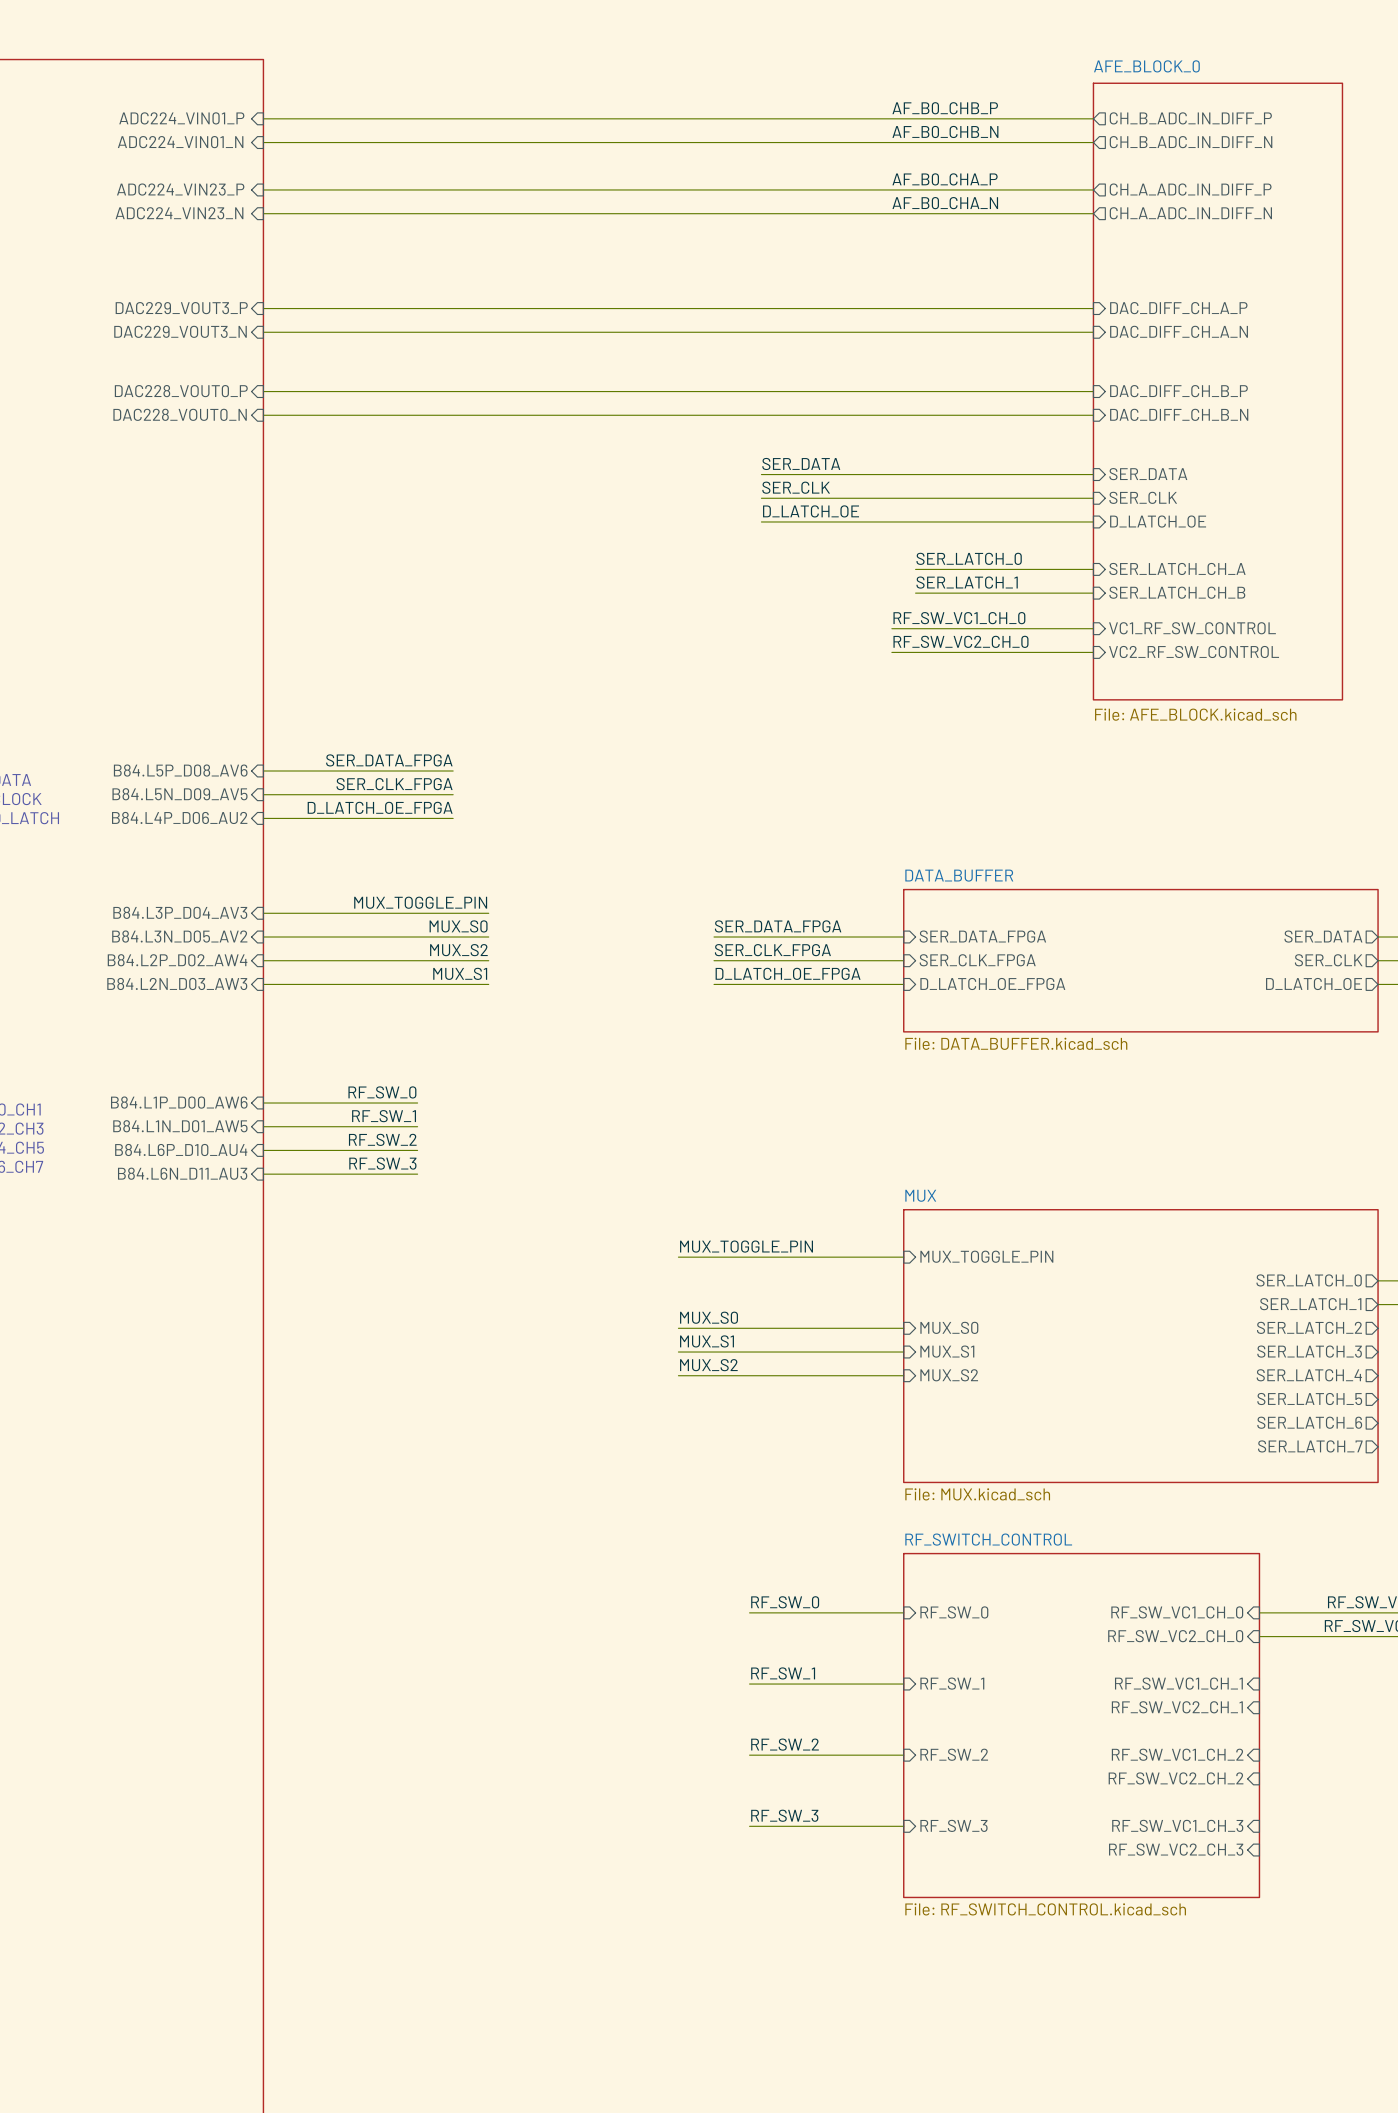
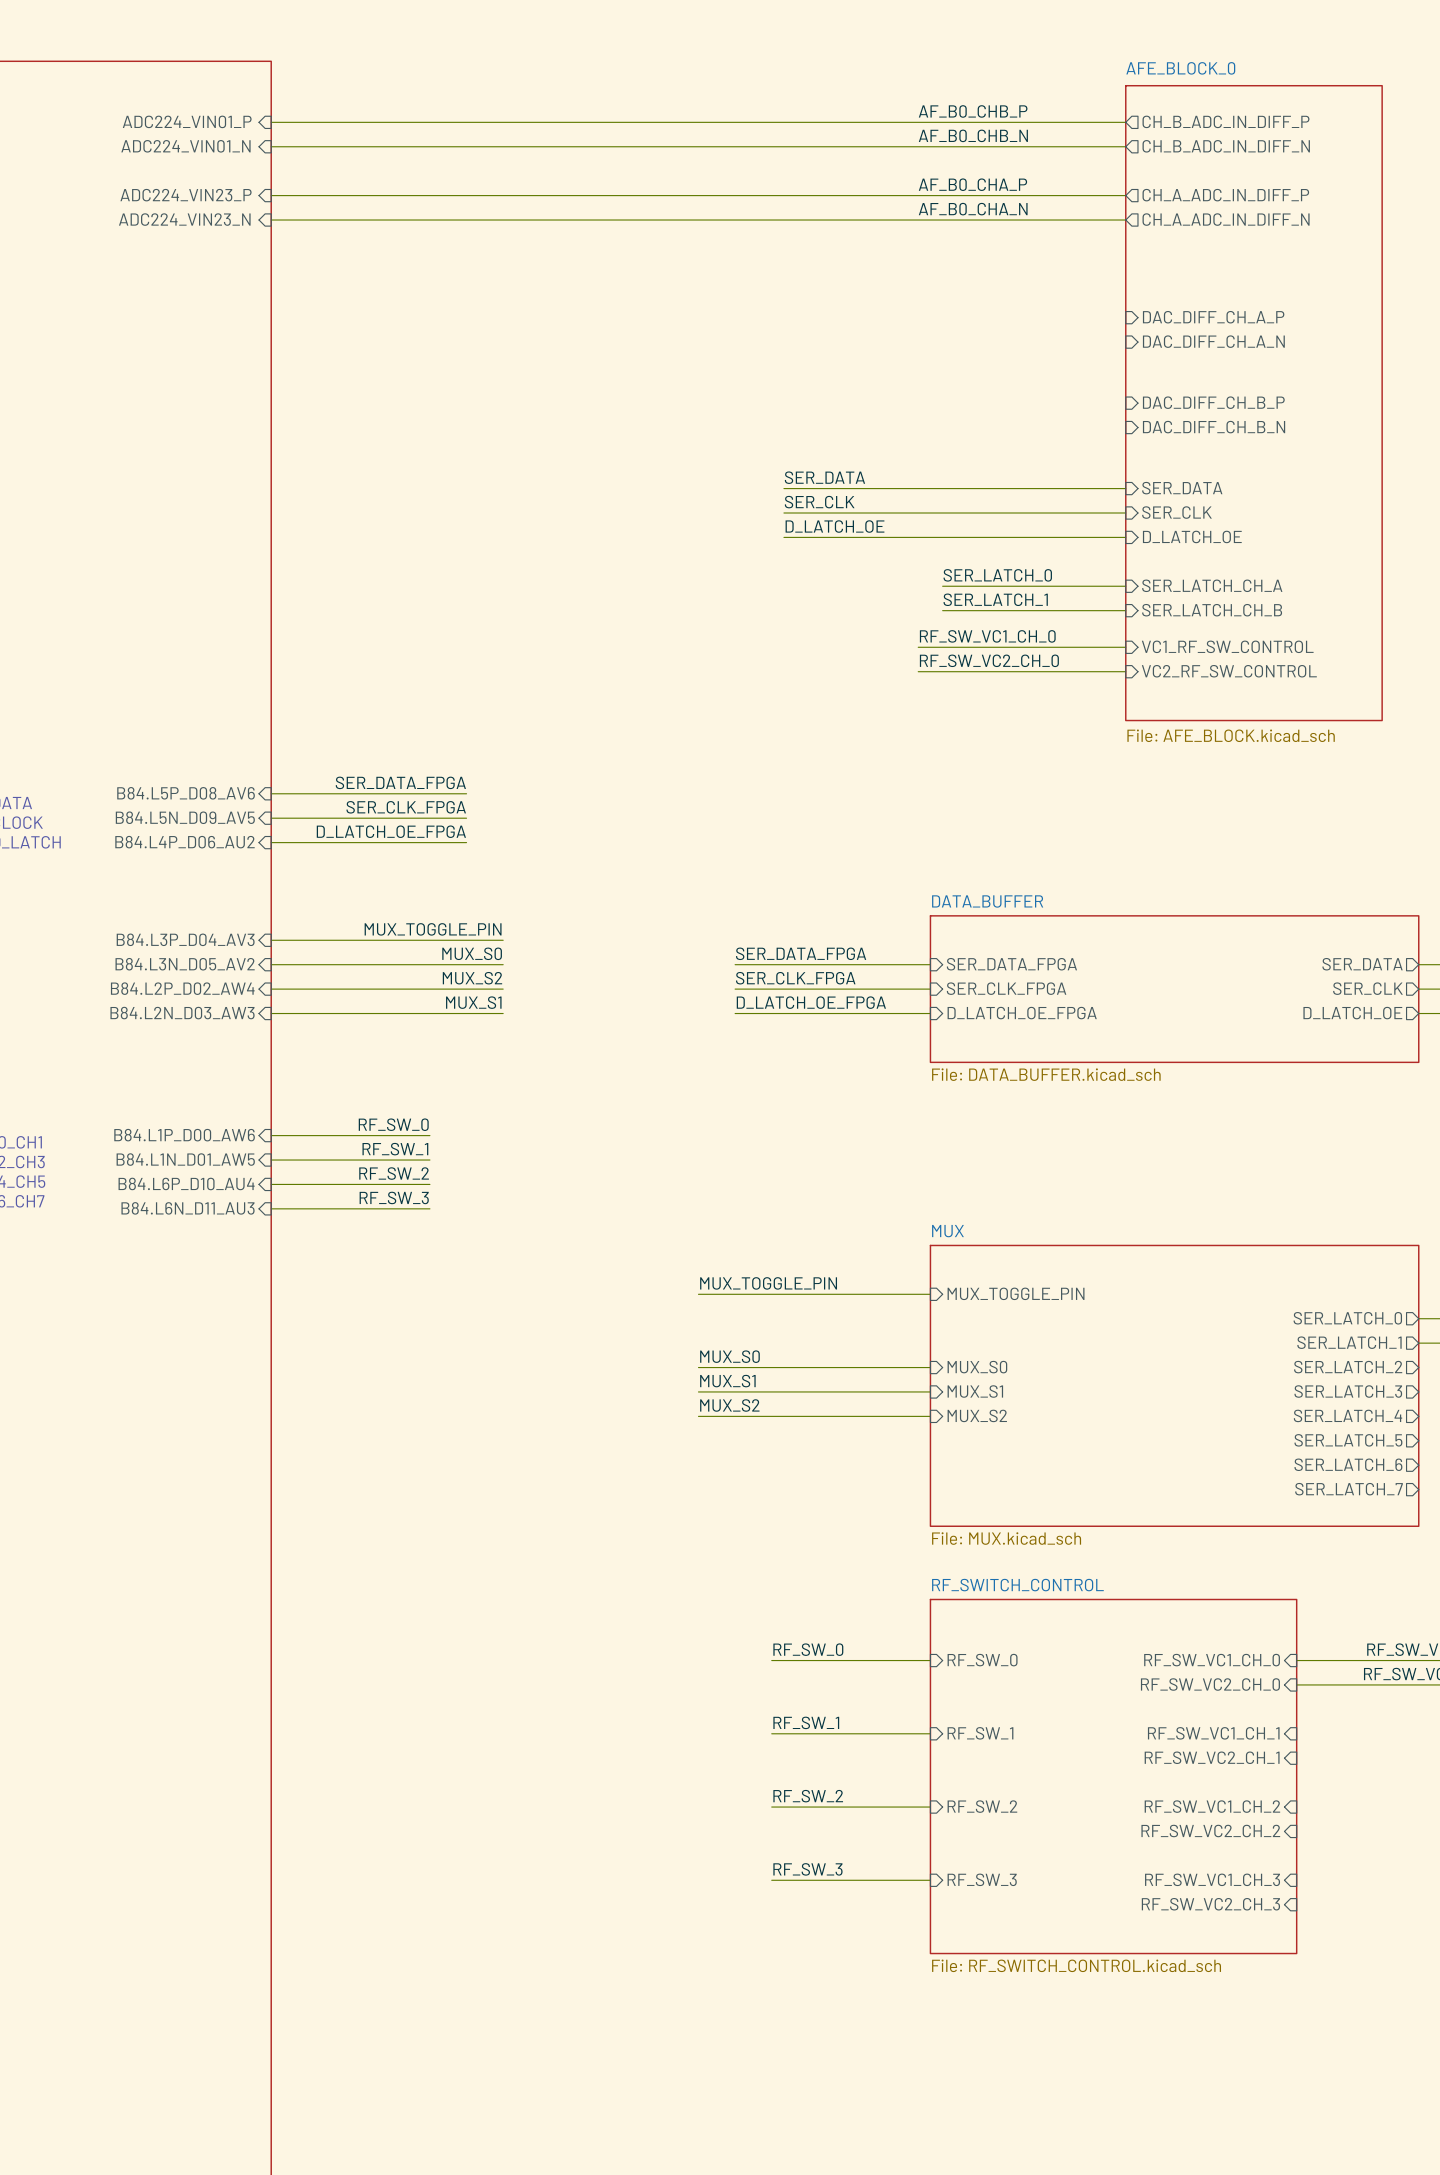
sheet pin: DAC229_VOUT3_P (181, 308) -> none
wire: (263, 308) (1093, 308) -> none
sheet pin: DAC229_VOUT3_N (180, 331) -> none
wire: (263, 332) (1093, 332) -> none
sheet pin: DAC228_VOUT0_P (181, 391) -> none
wire: (263, 391) (1093, 391) -> none
sheet pin: DAC228_VOUT0_N (180, 414) -> none
wire: (263, 415) (1093, 415) -> none

